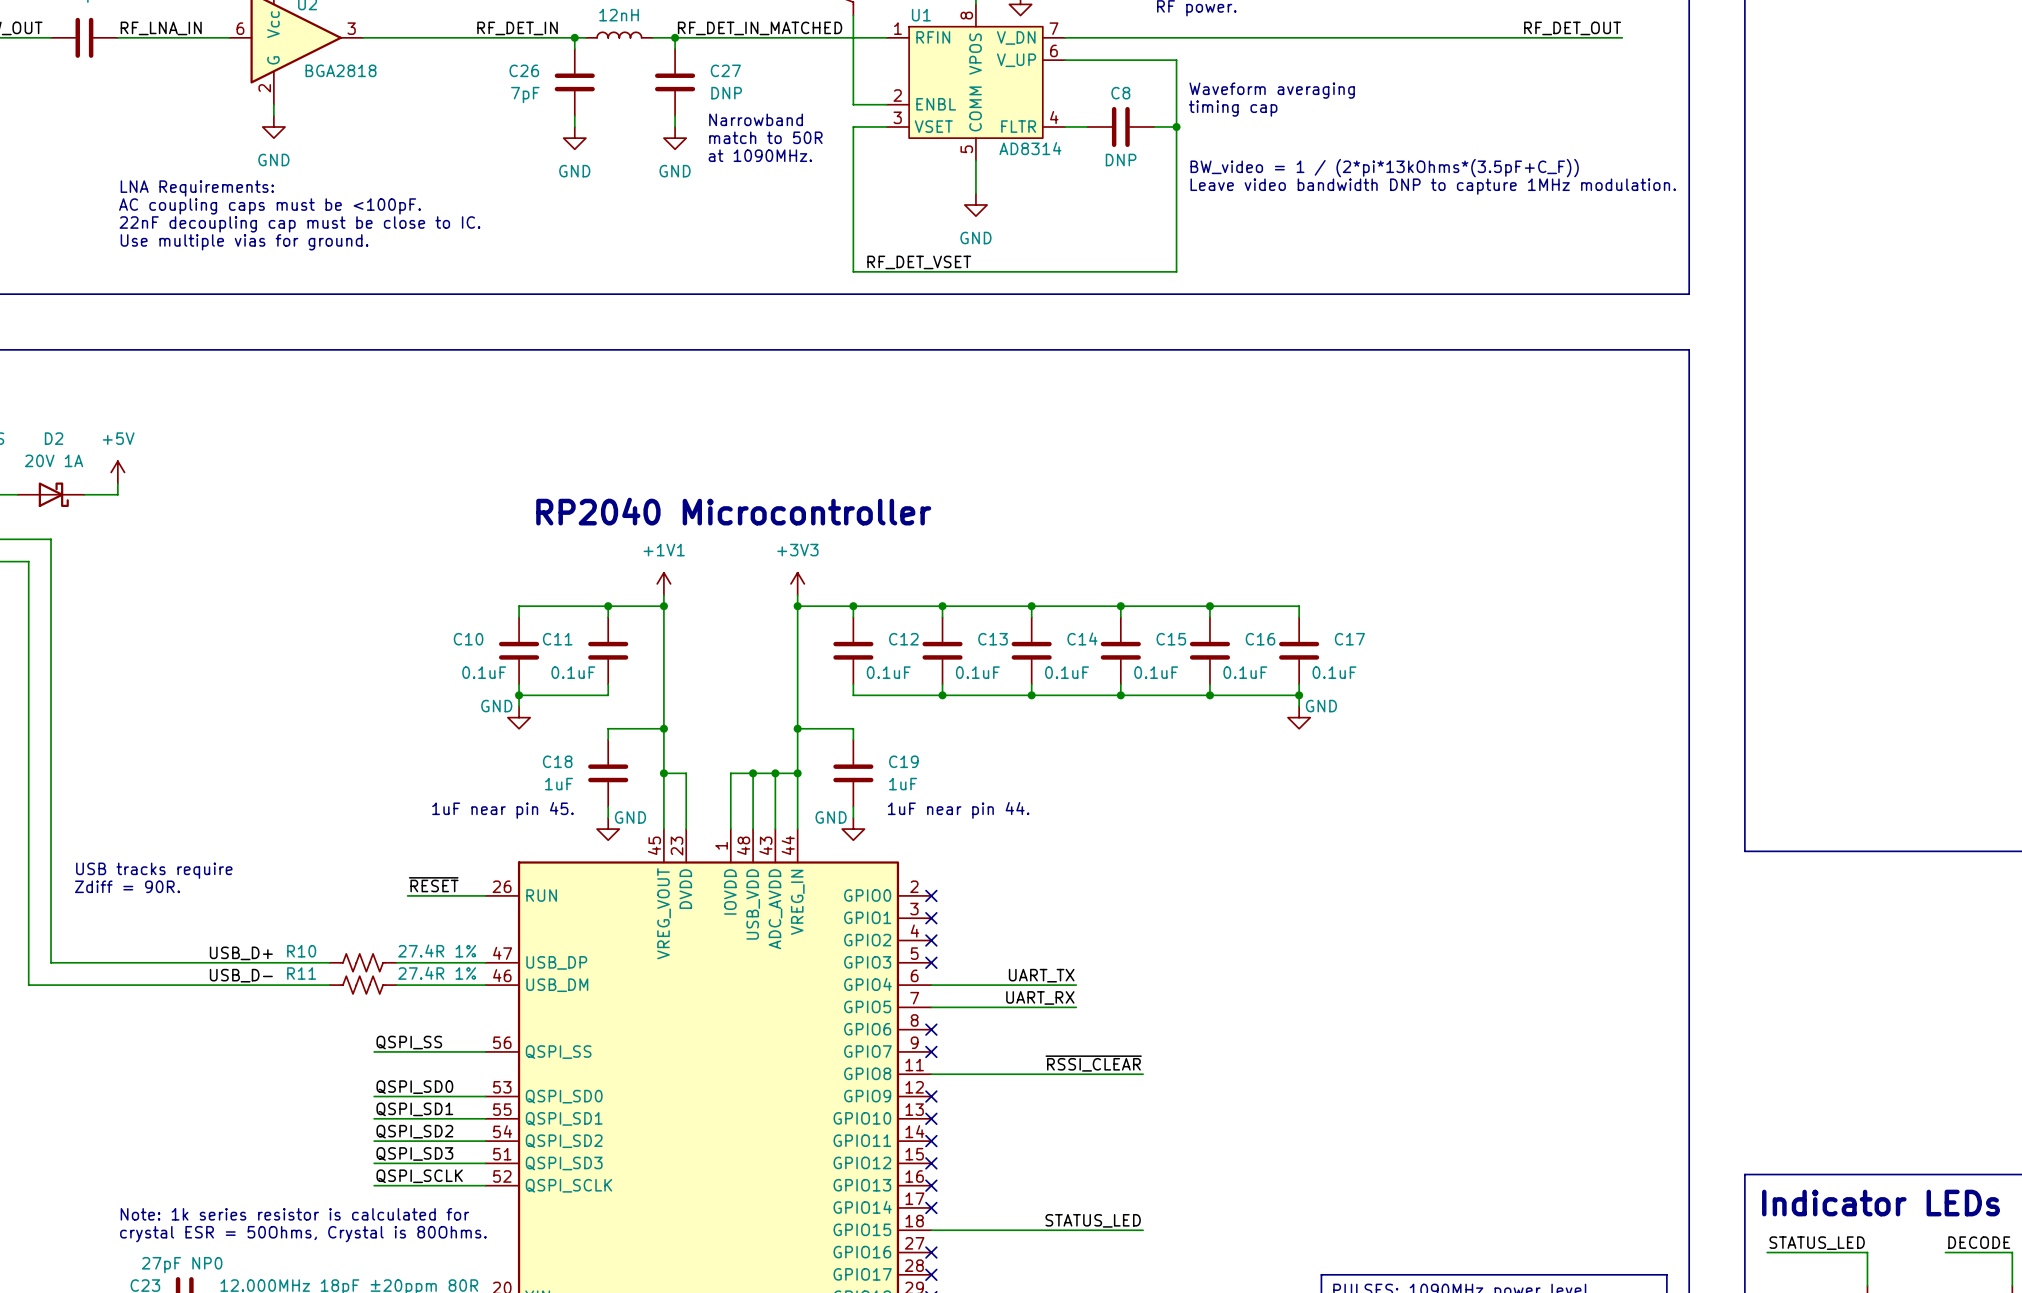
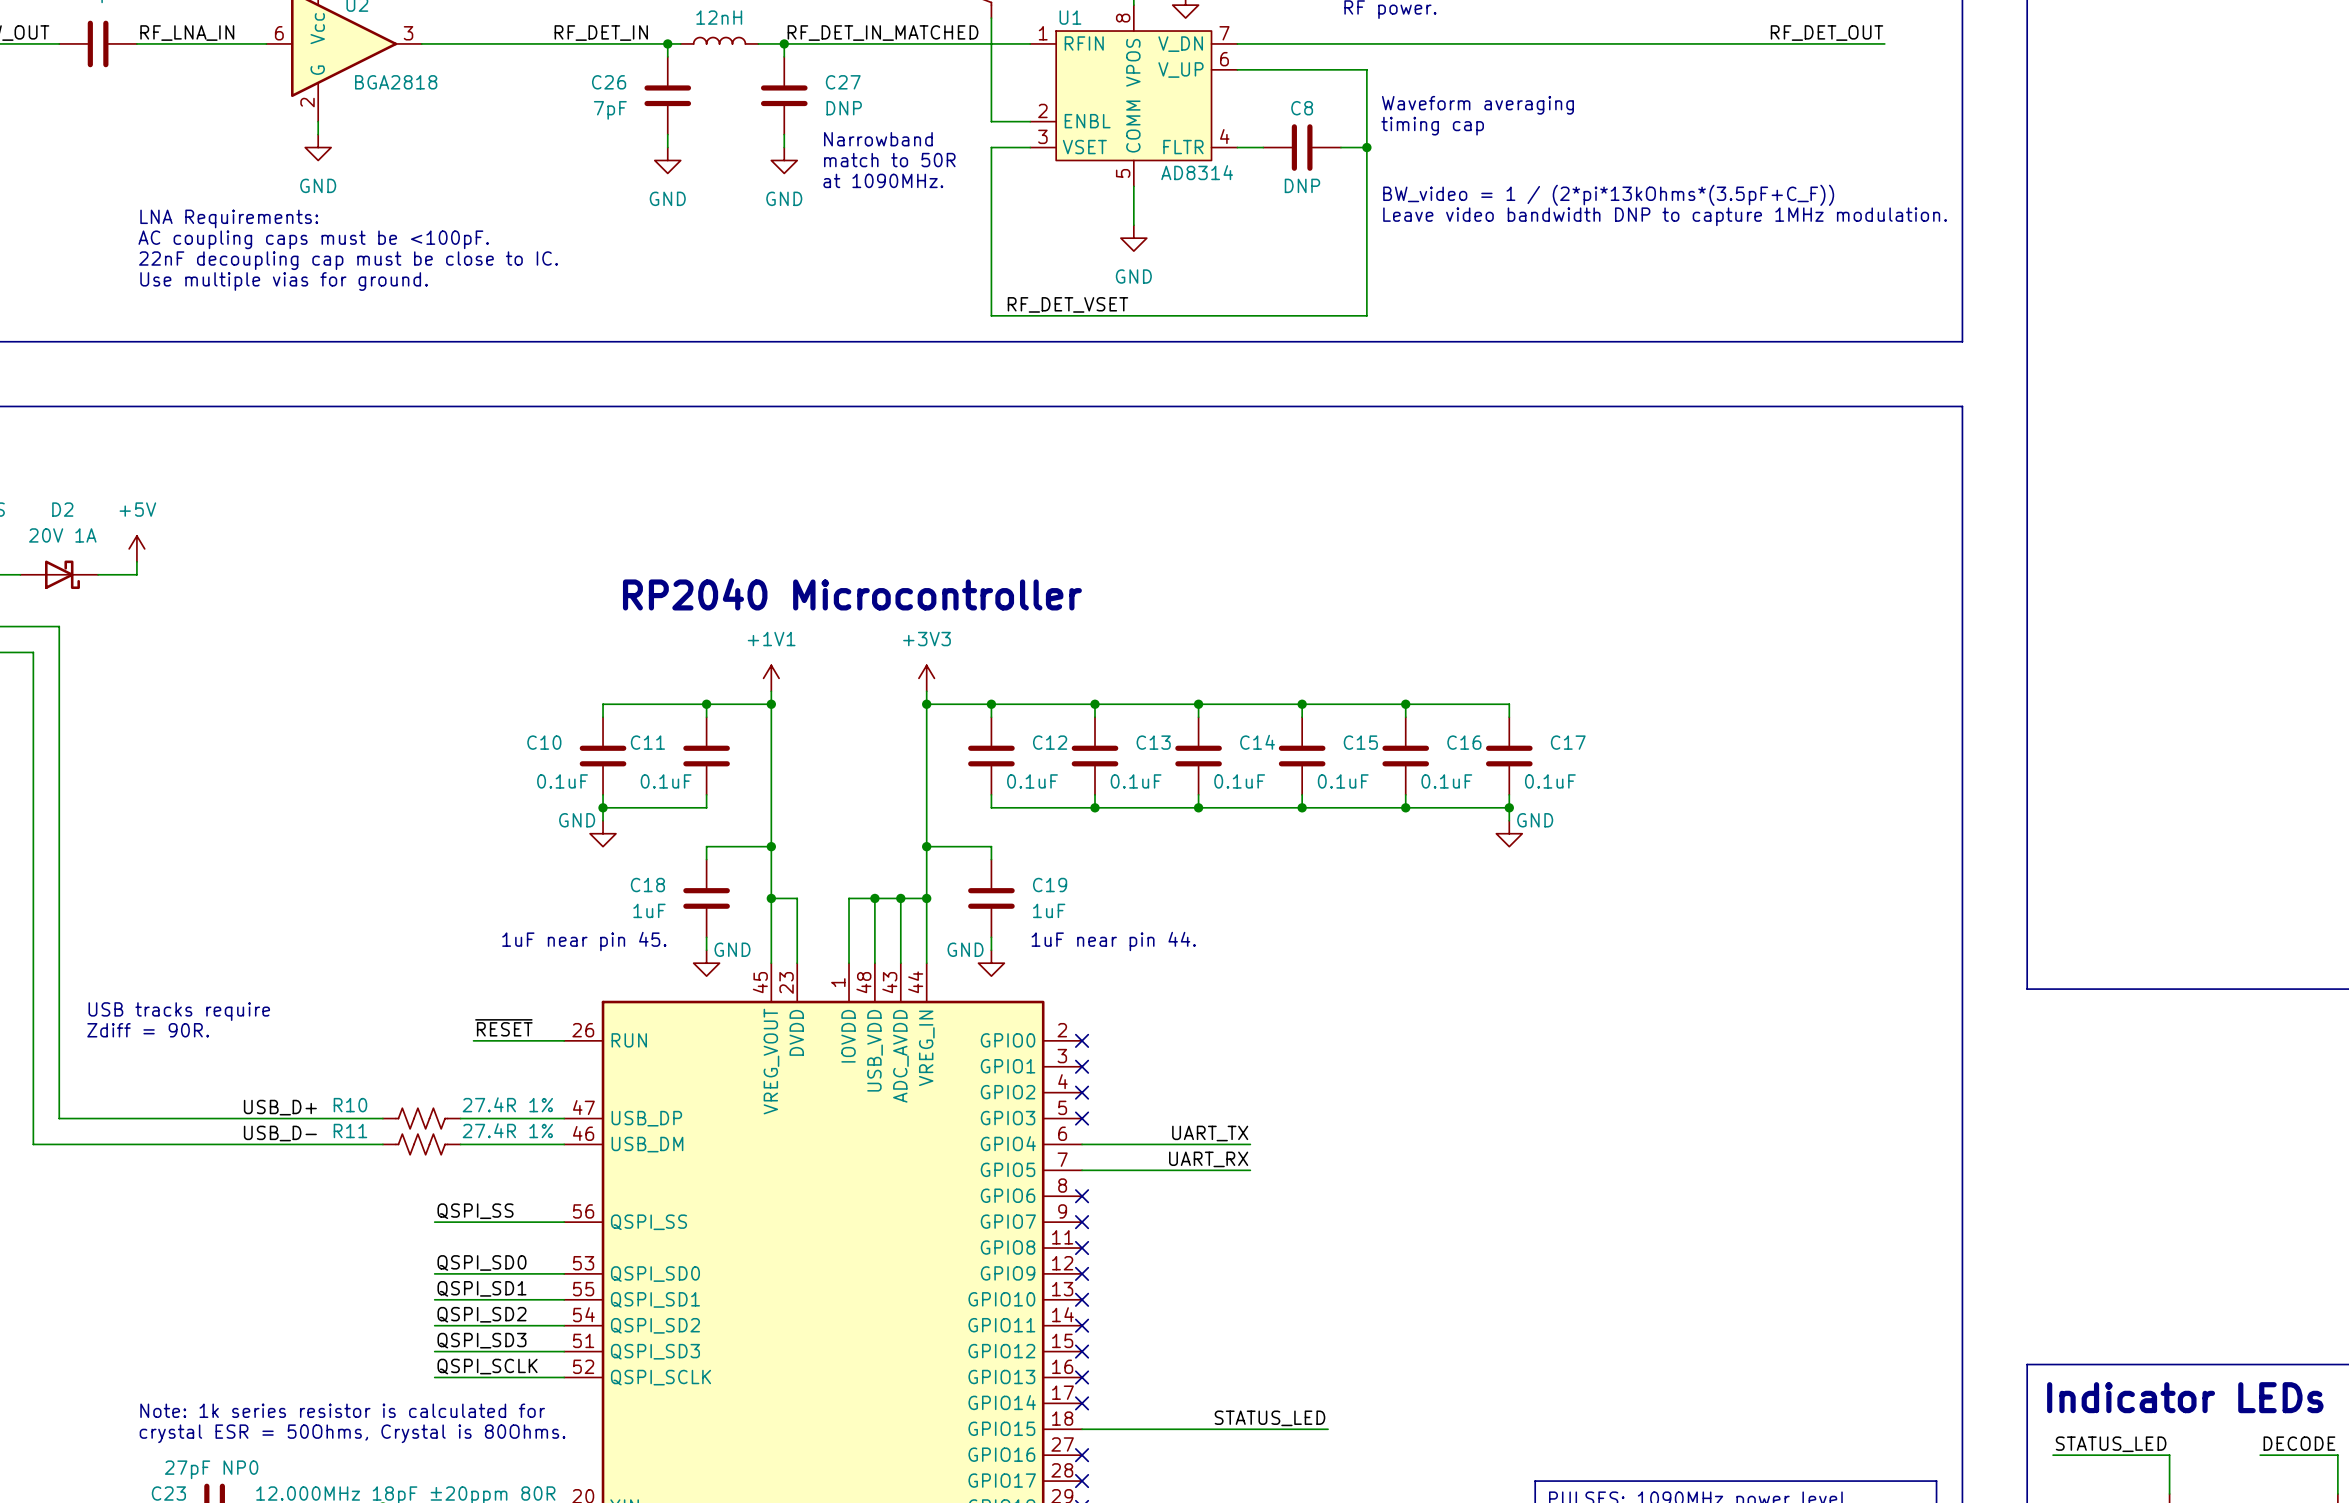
label: ~{RSSI_CLEAR} (1093, 1063) -> none
wire: (931, 1074) (1143, 1074) -> none
no-connect mark: none -> (1082, 1248)

